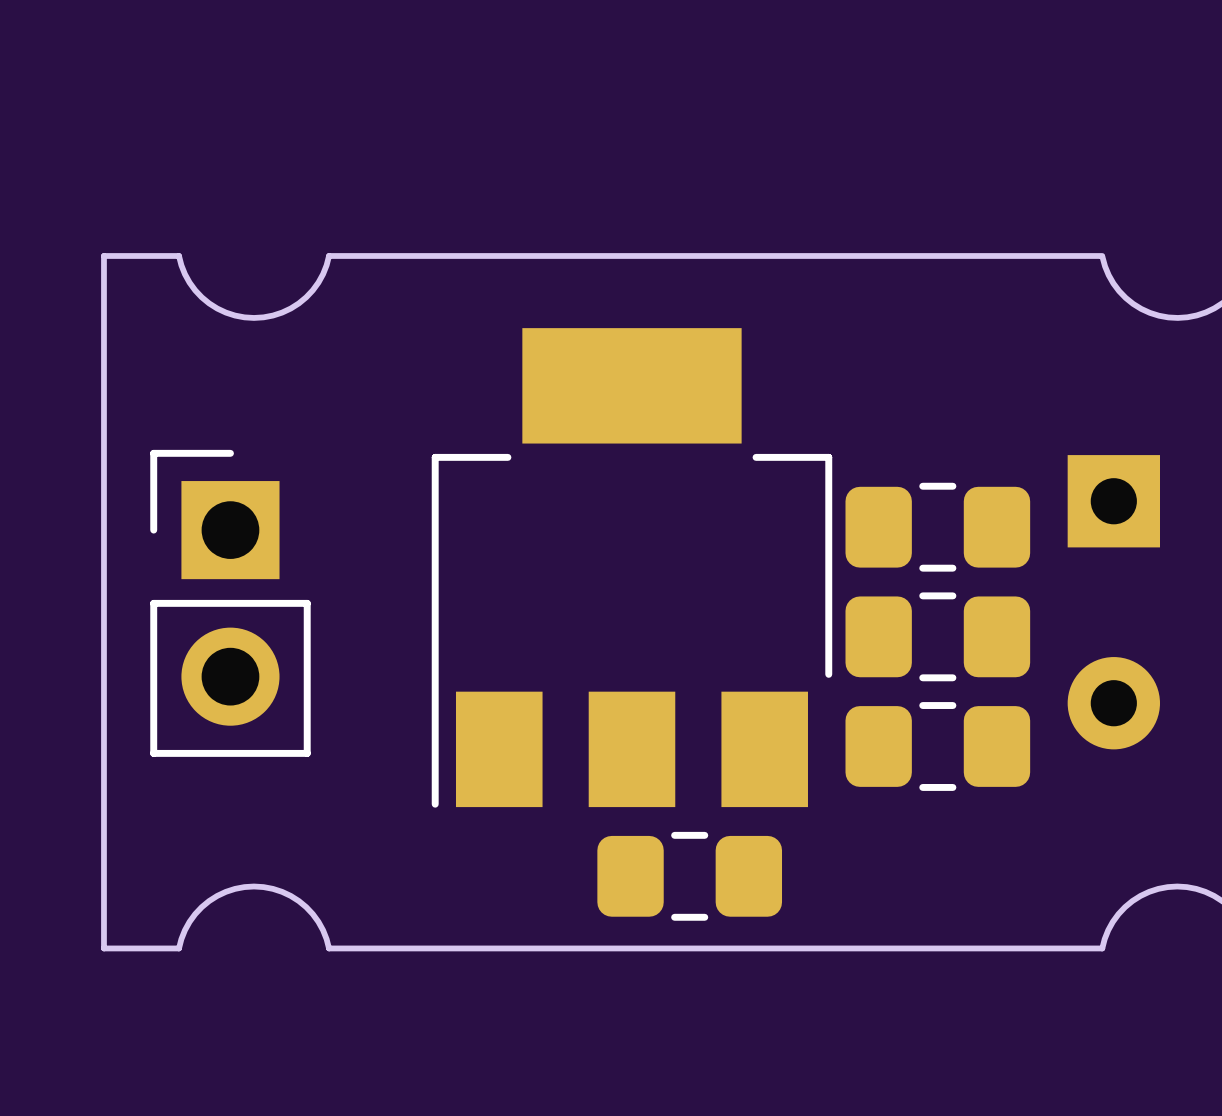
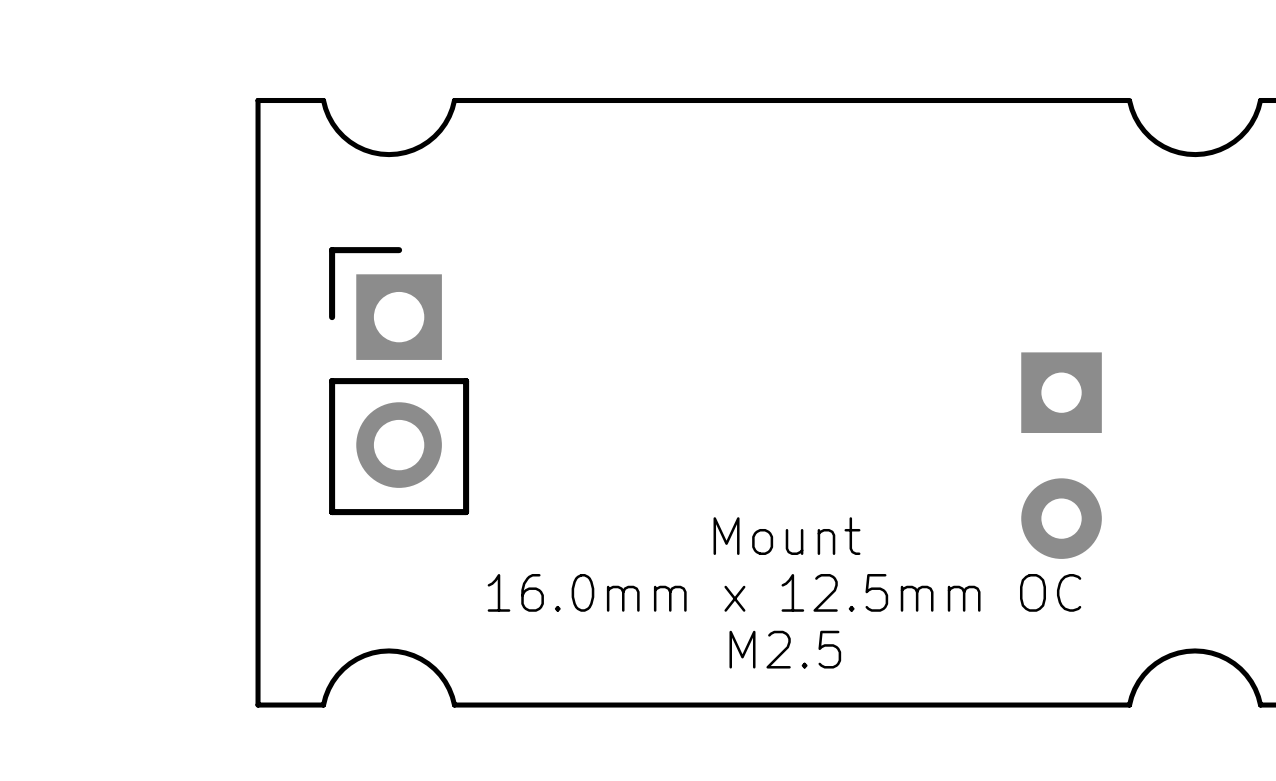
part: (937, 527) -> none
part: (631, 567) -> none
part: (1113, 602) -> none
part position: (230, 603) -> (399, 381)
part: (937, 636) -> none
part: none -> (1061, 455)
part: (937, 746) -> none
text: none -> Mount (786, 536)
text: none -> 16.0mm x 12.5mm OC (784, 592)
part: (689, 876) -> none
text: none -> M2.5 (785, 649)

